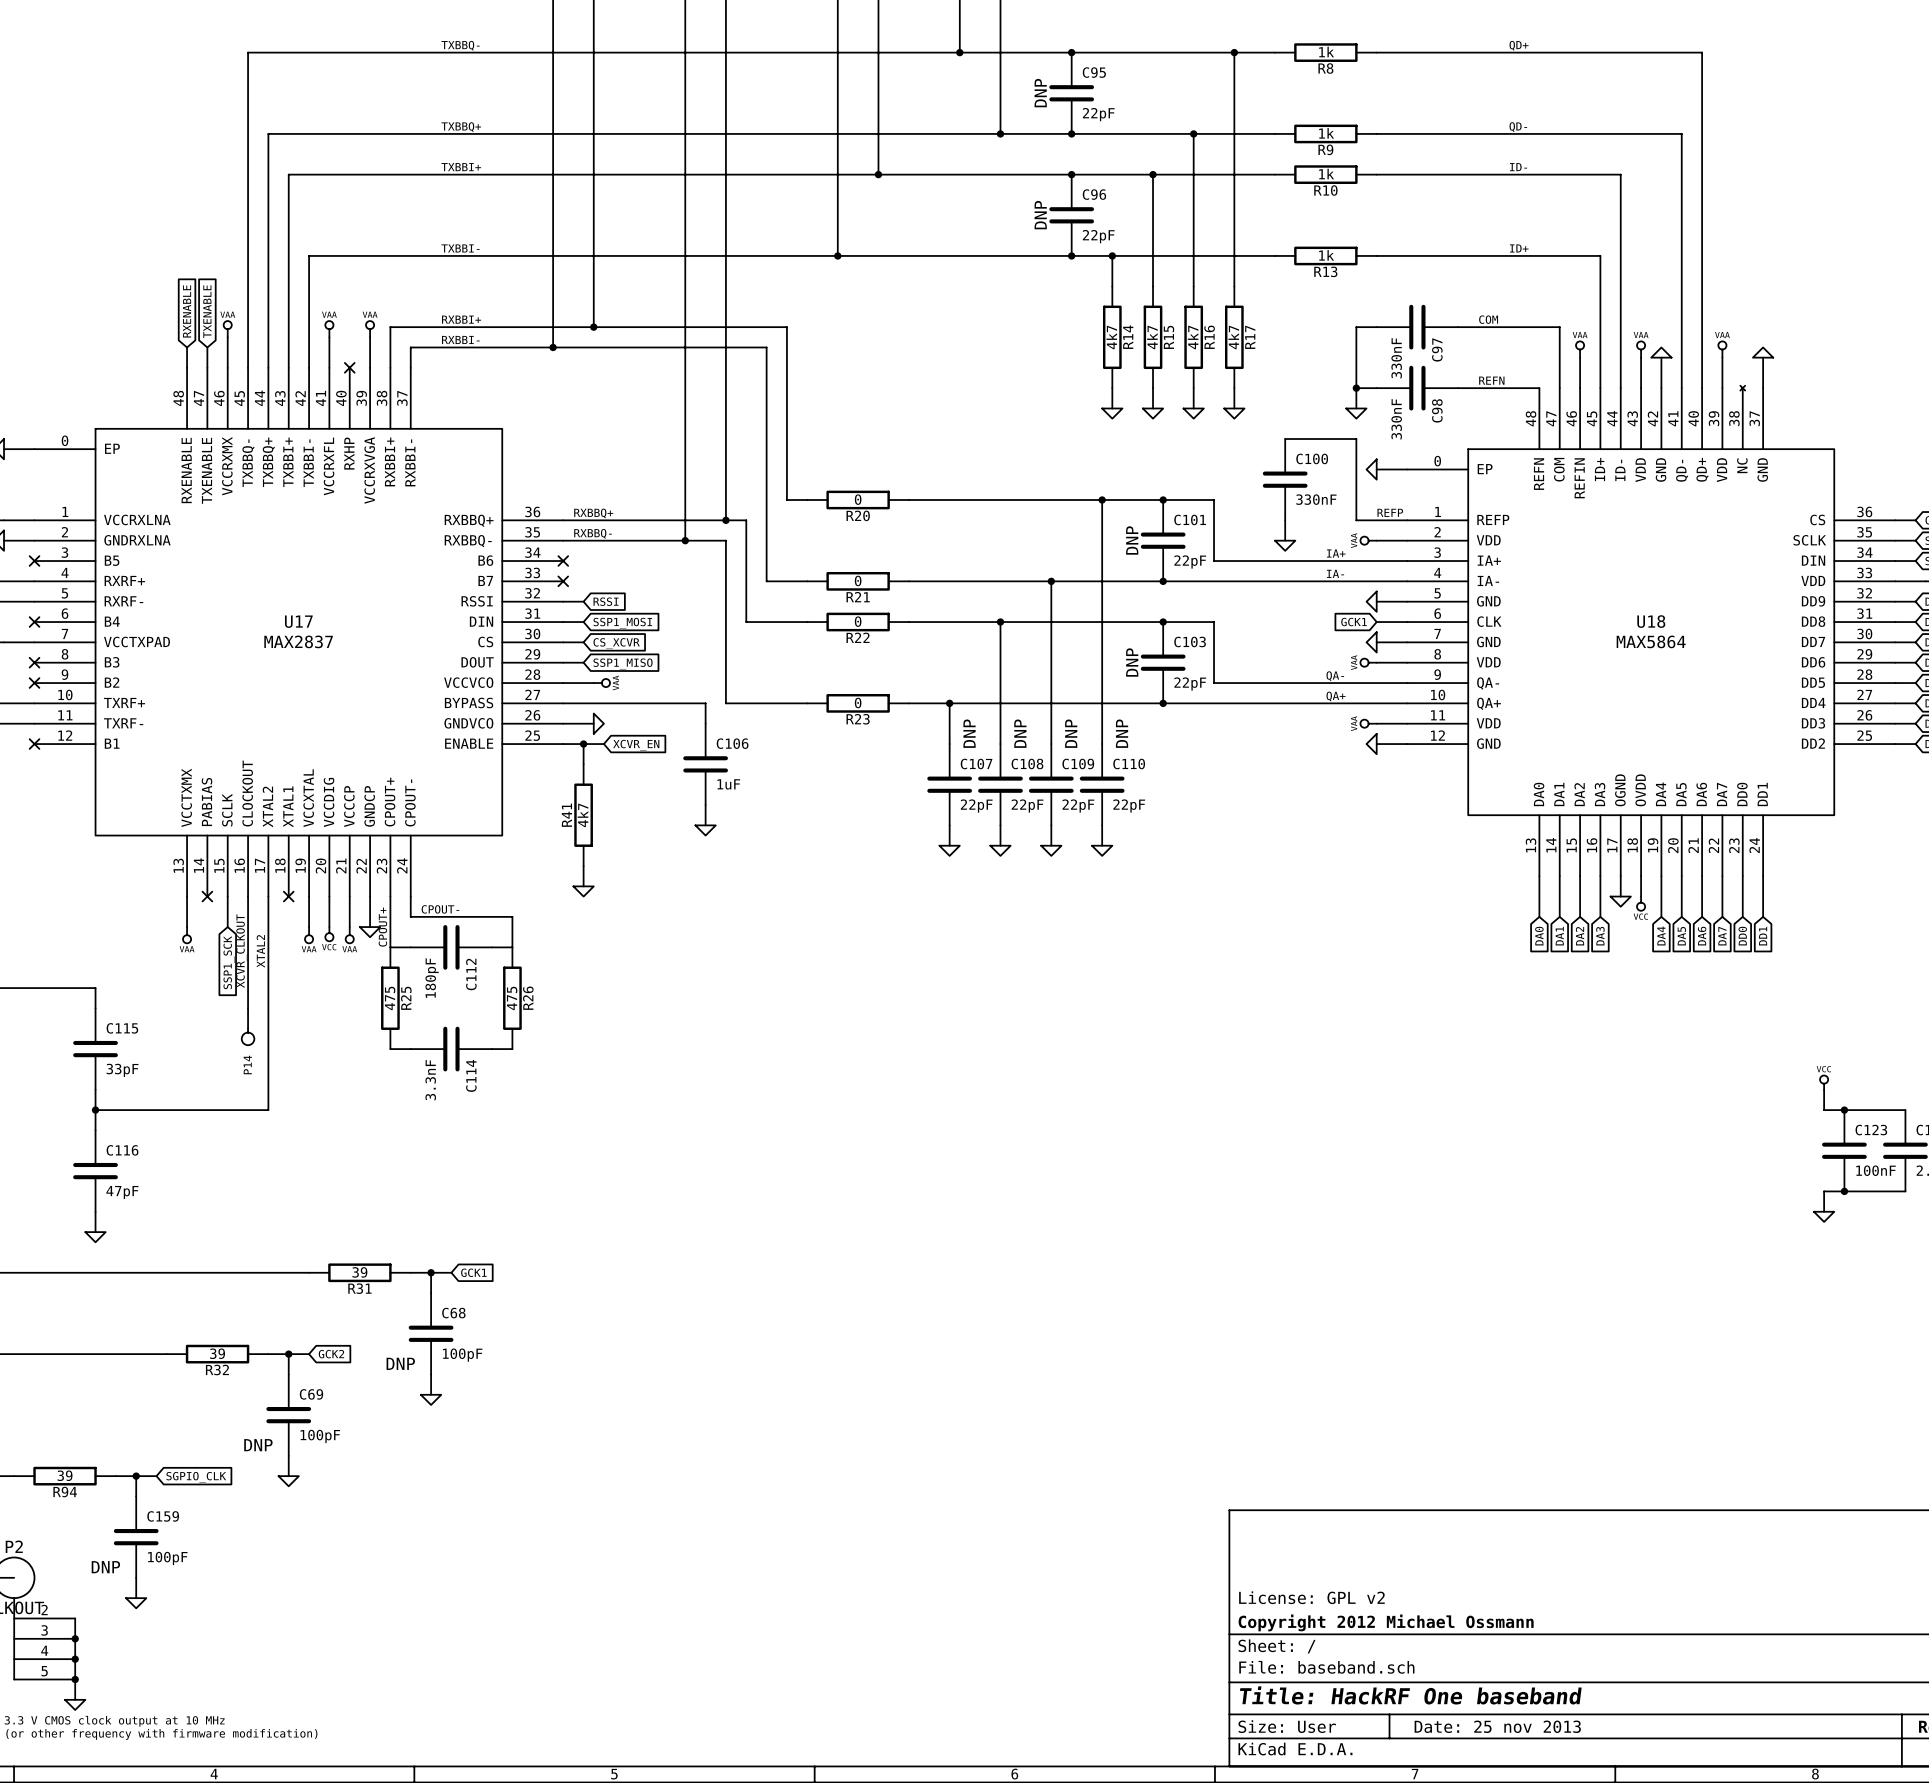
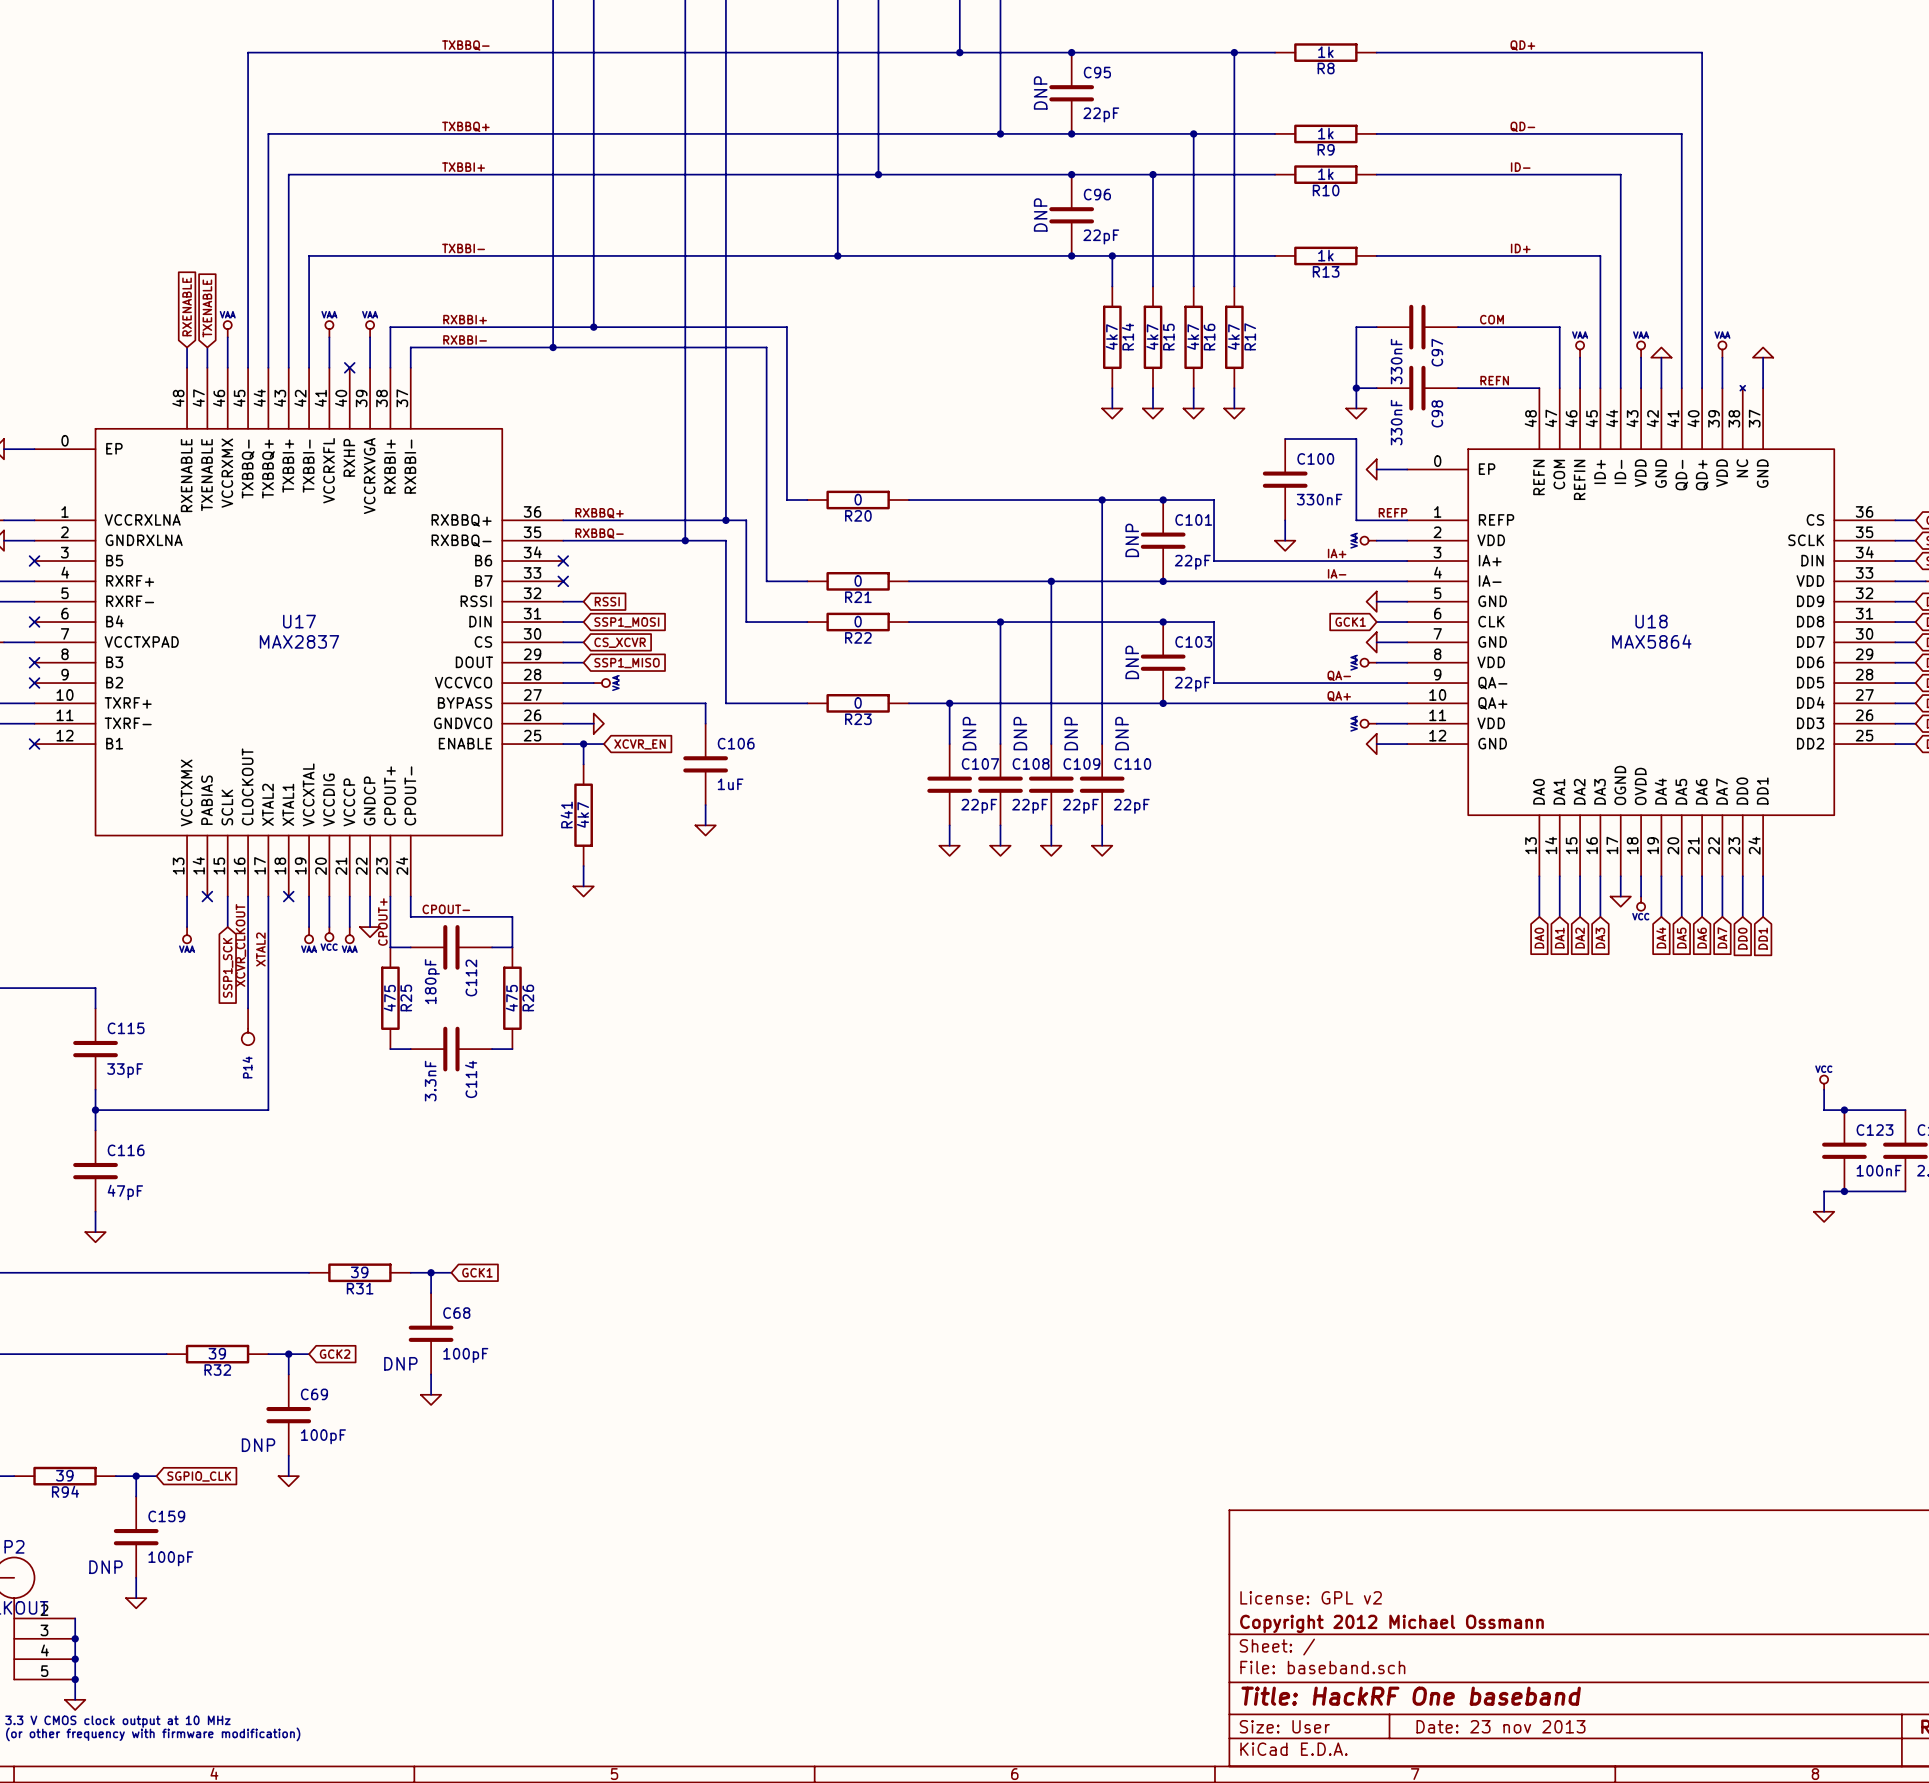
title block: Date: 25 nov 2013 (1497, 1726) -> Date: 23 nov 2013 (1500, 1726)

